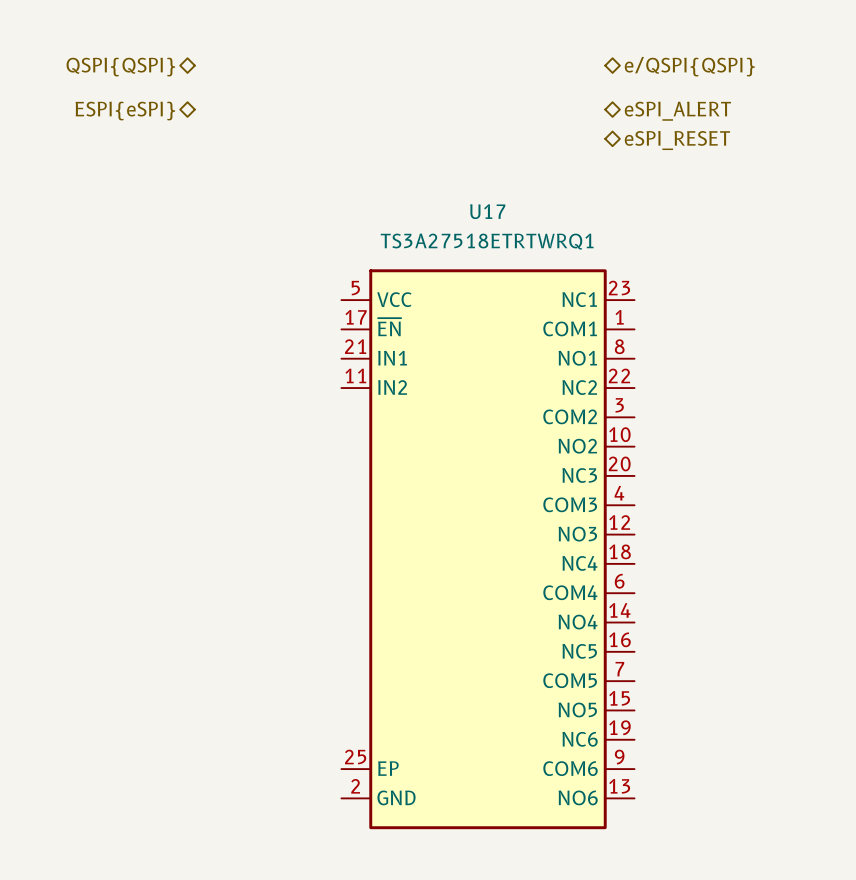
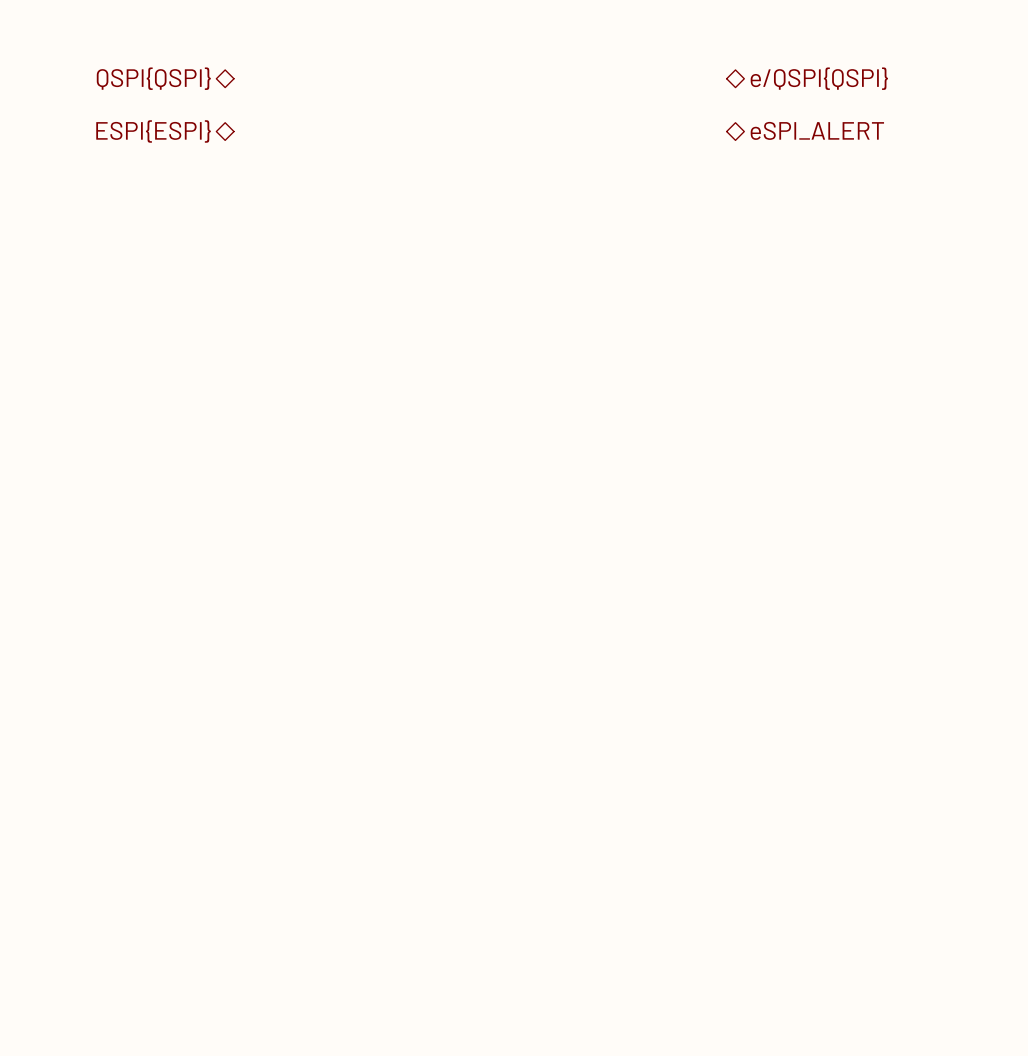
hierarchical label: ESPI{eSPI} (125, 111) -> ESPI{ESPI} (153, 131)
hierarchical label: eSPI_RESET (677, 140) -> none
U17: (487, 549) -> none

